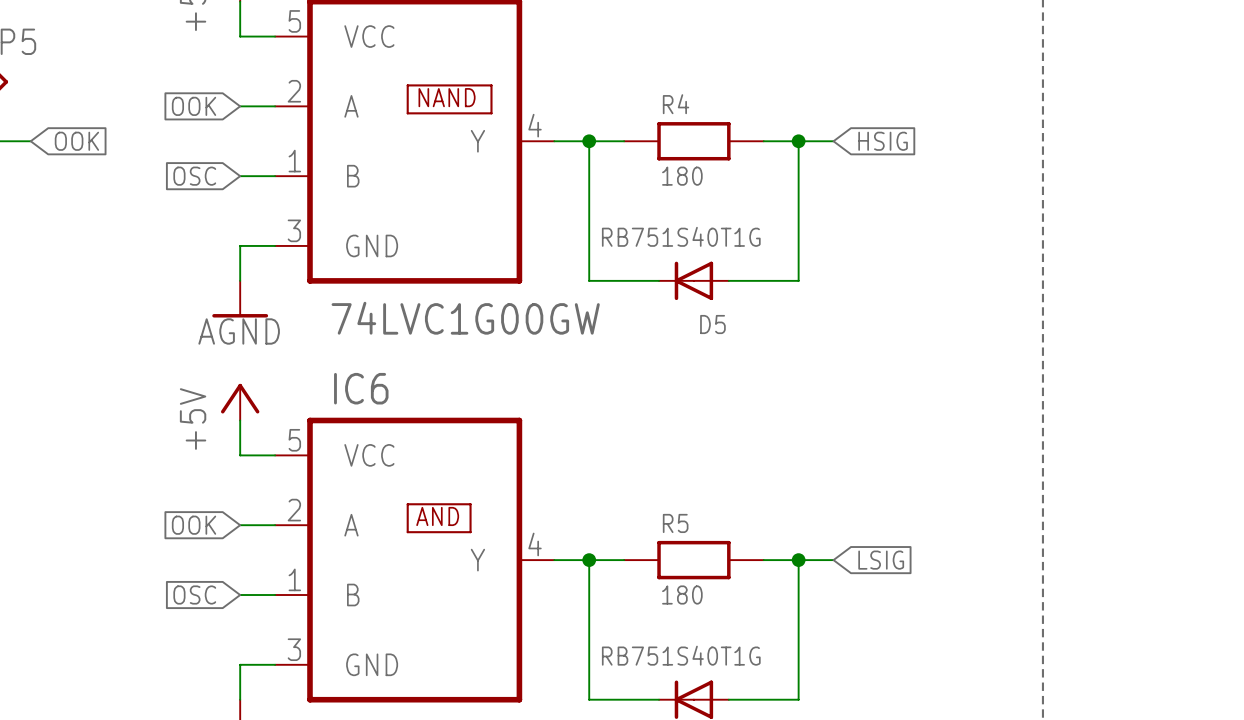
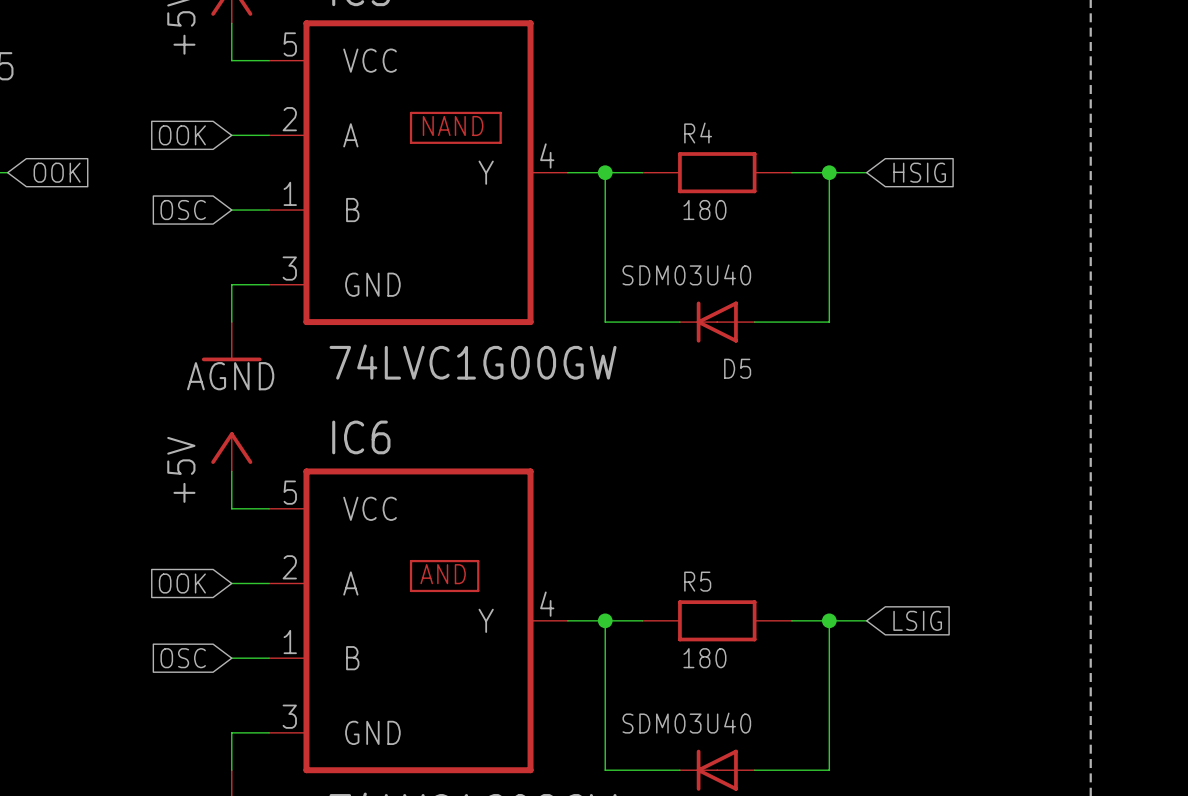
D5 value: RB751S40T1G (681, 236) -> SDM03U40 (686, 274)
part value: RB751S40T1G (681, 655) -> SDM03U40 (686, 723)

